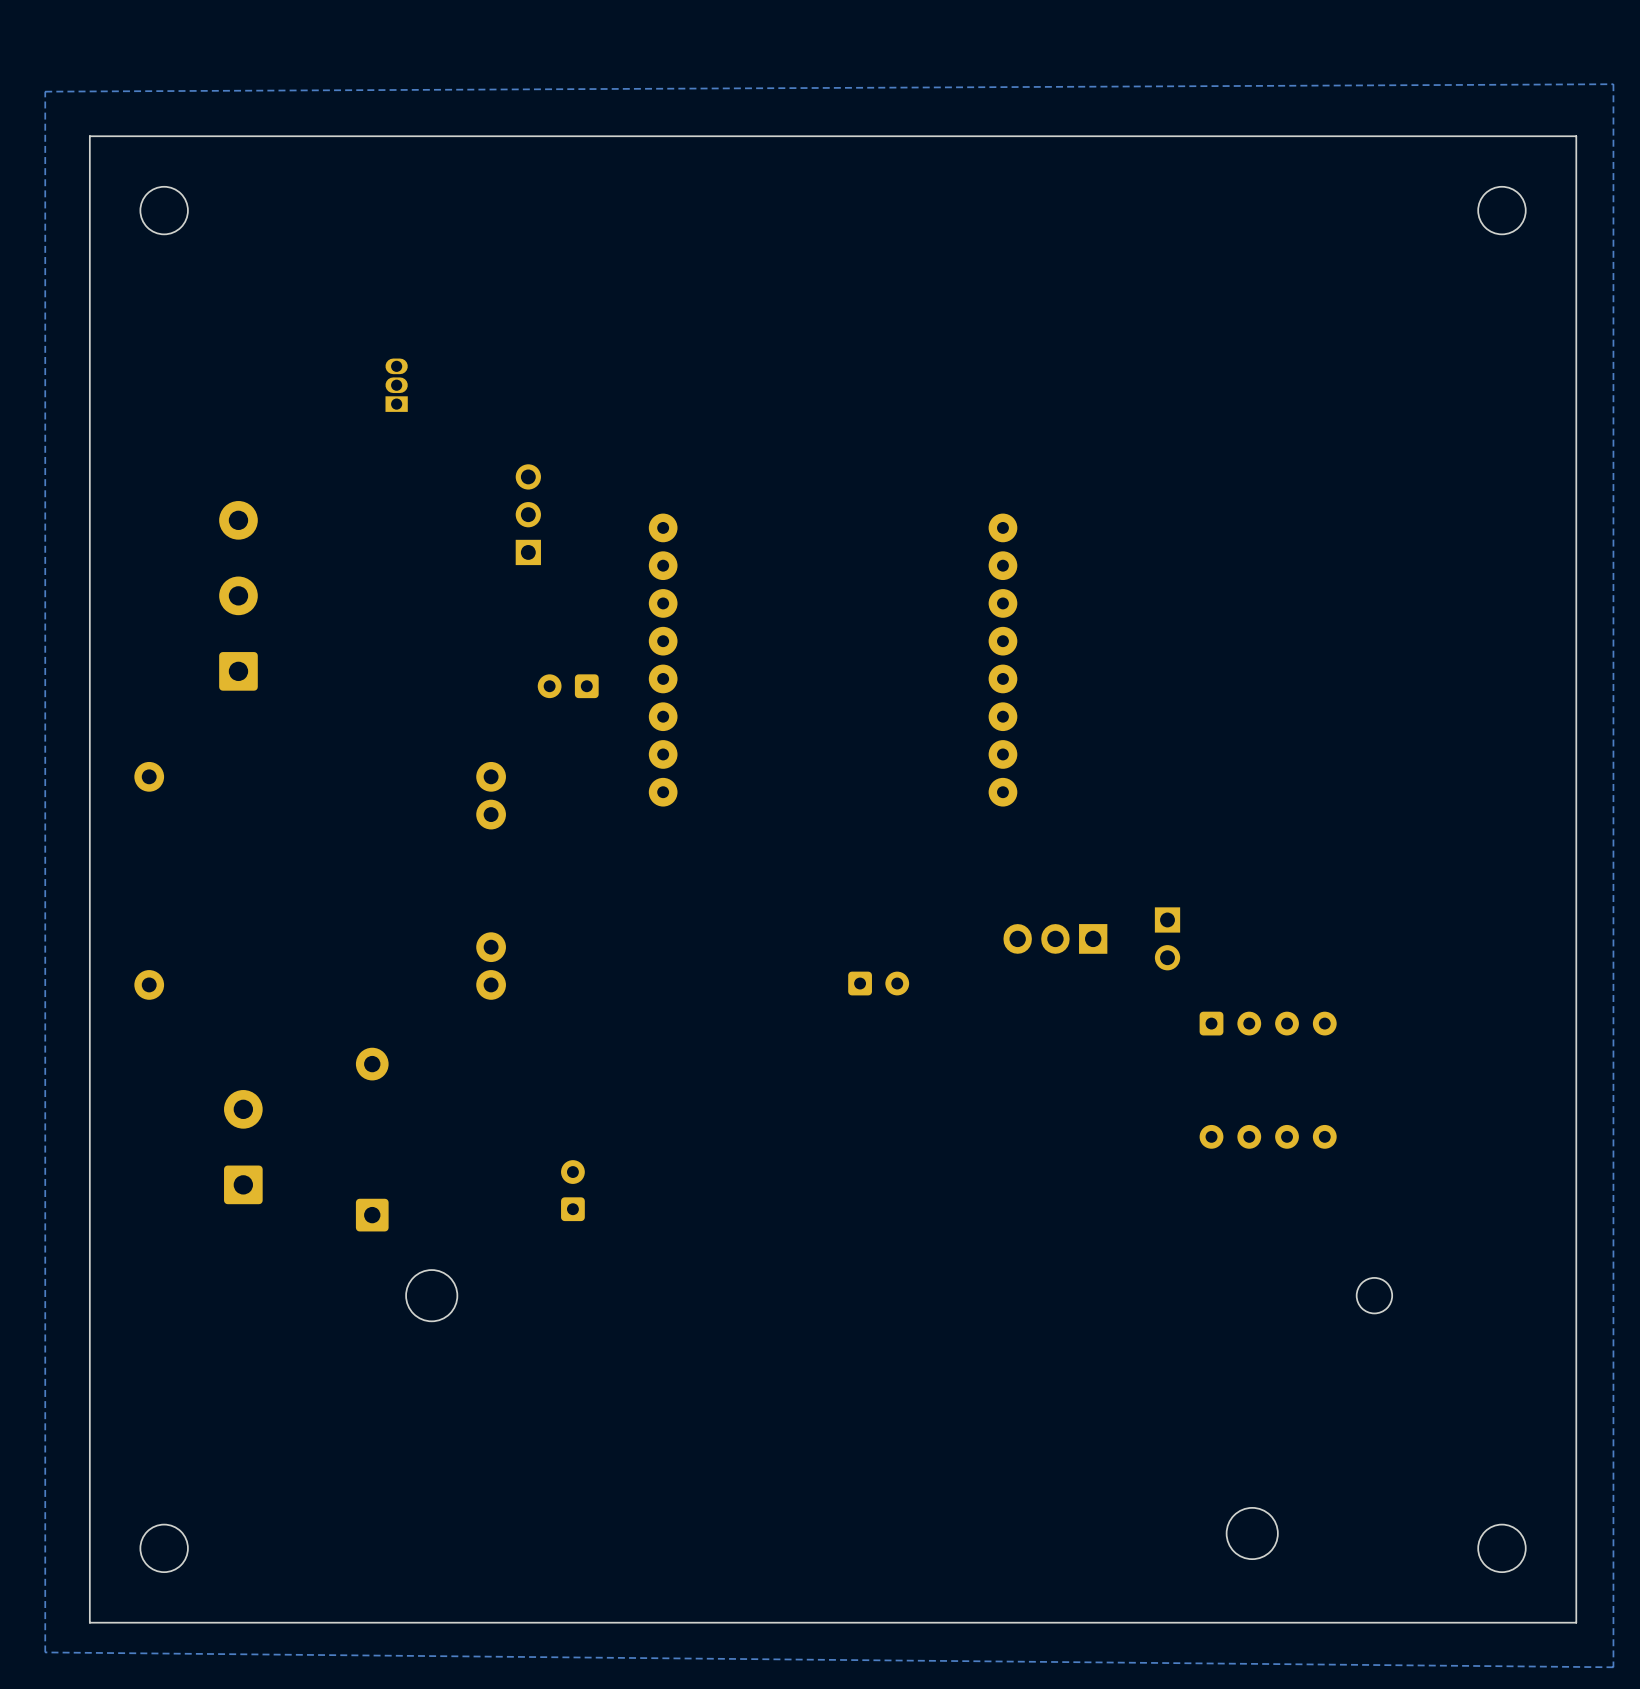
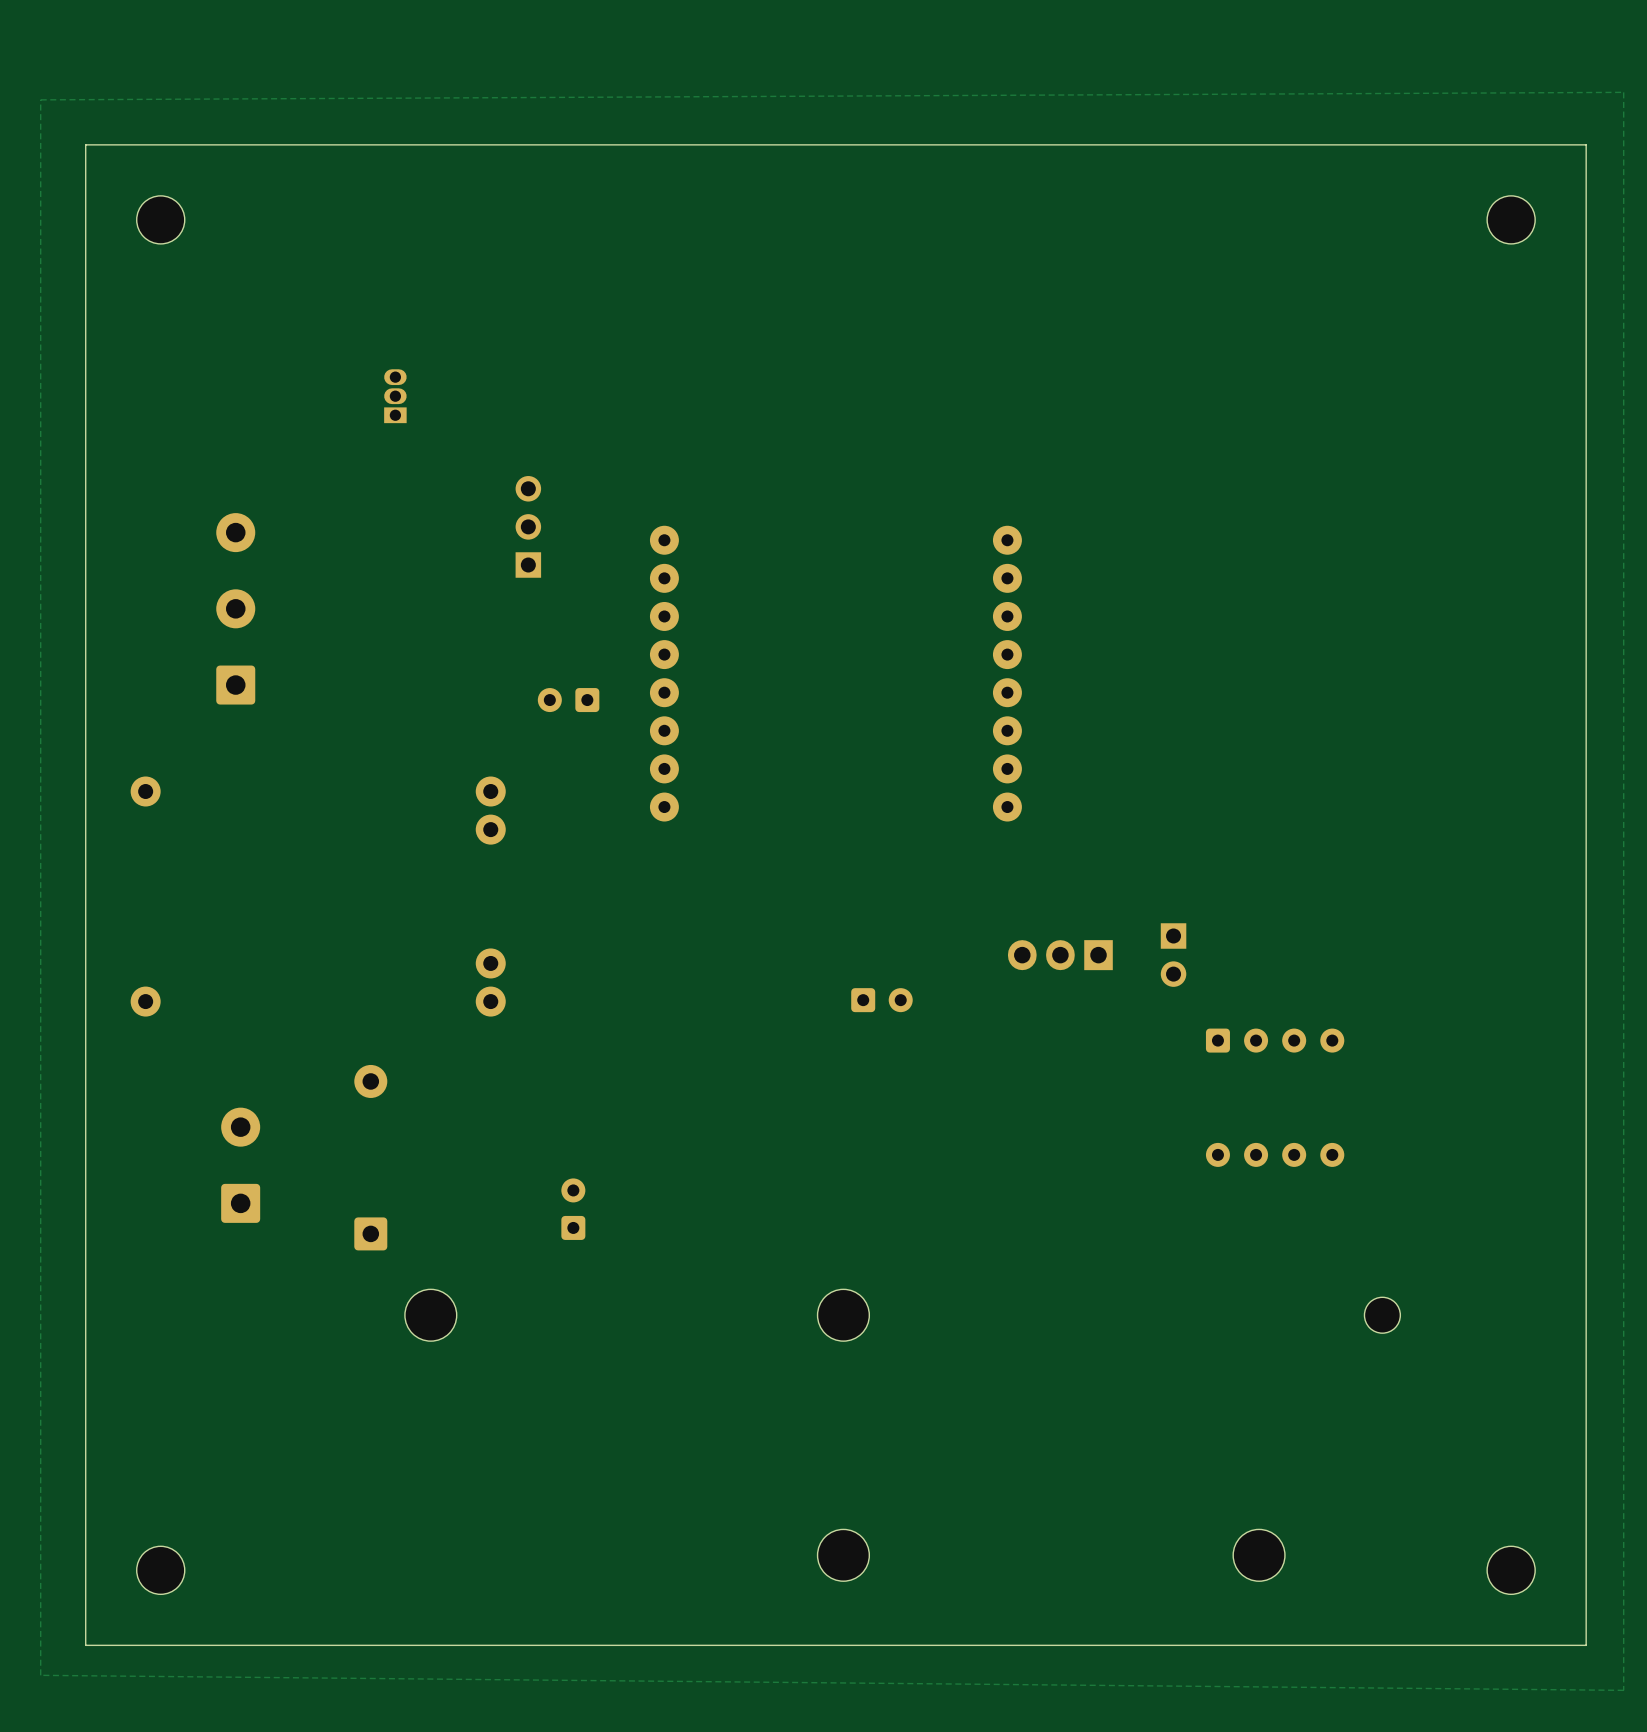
part: none -> (843, 1315)
part: none -> (843, 1555)

